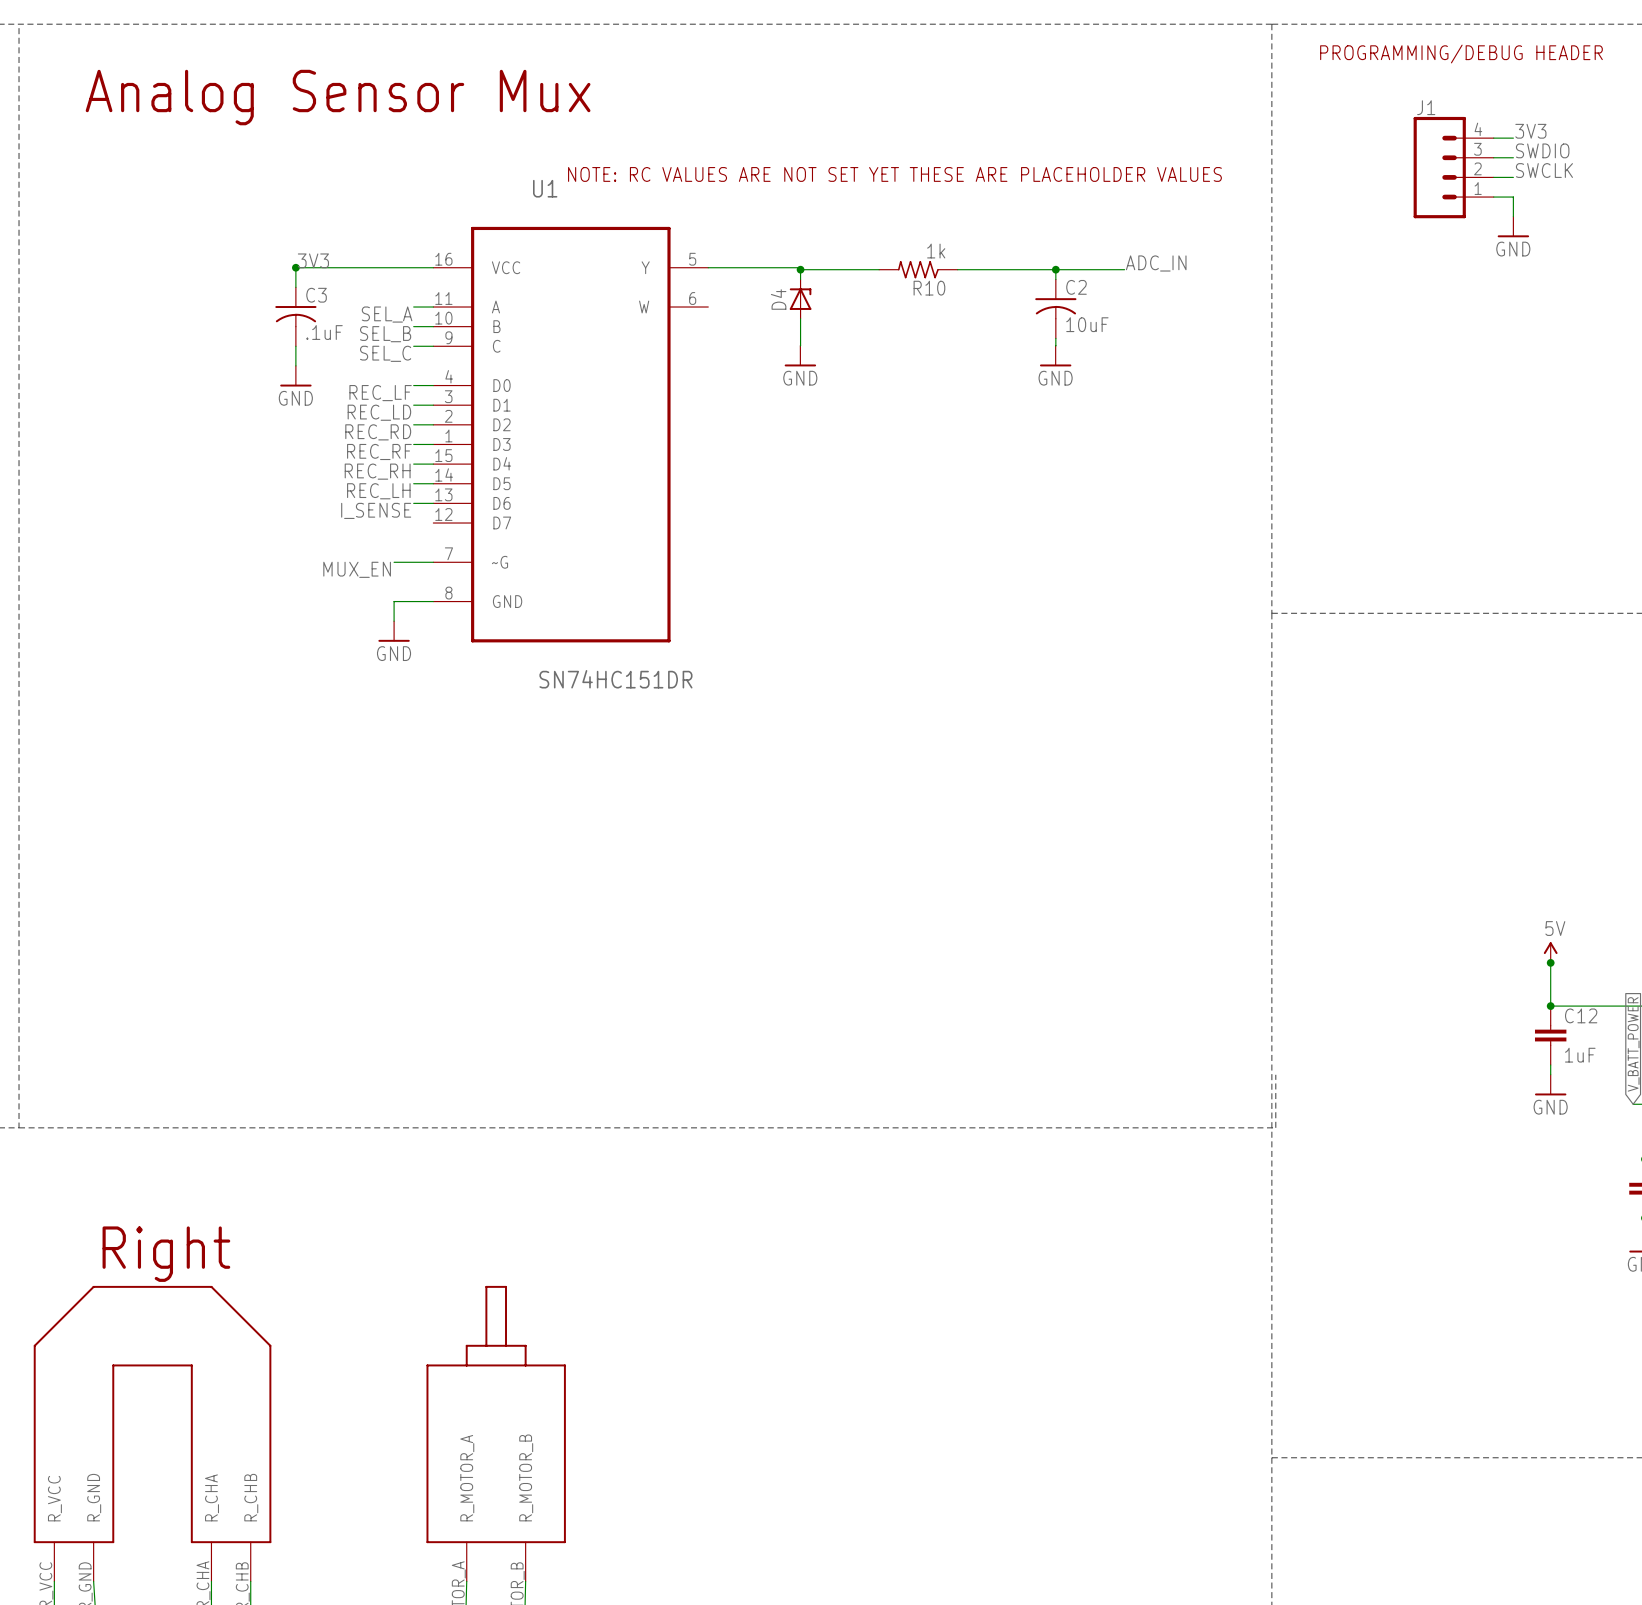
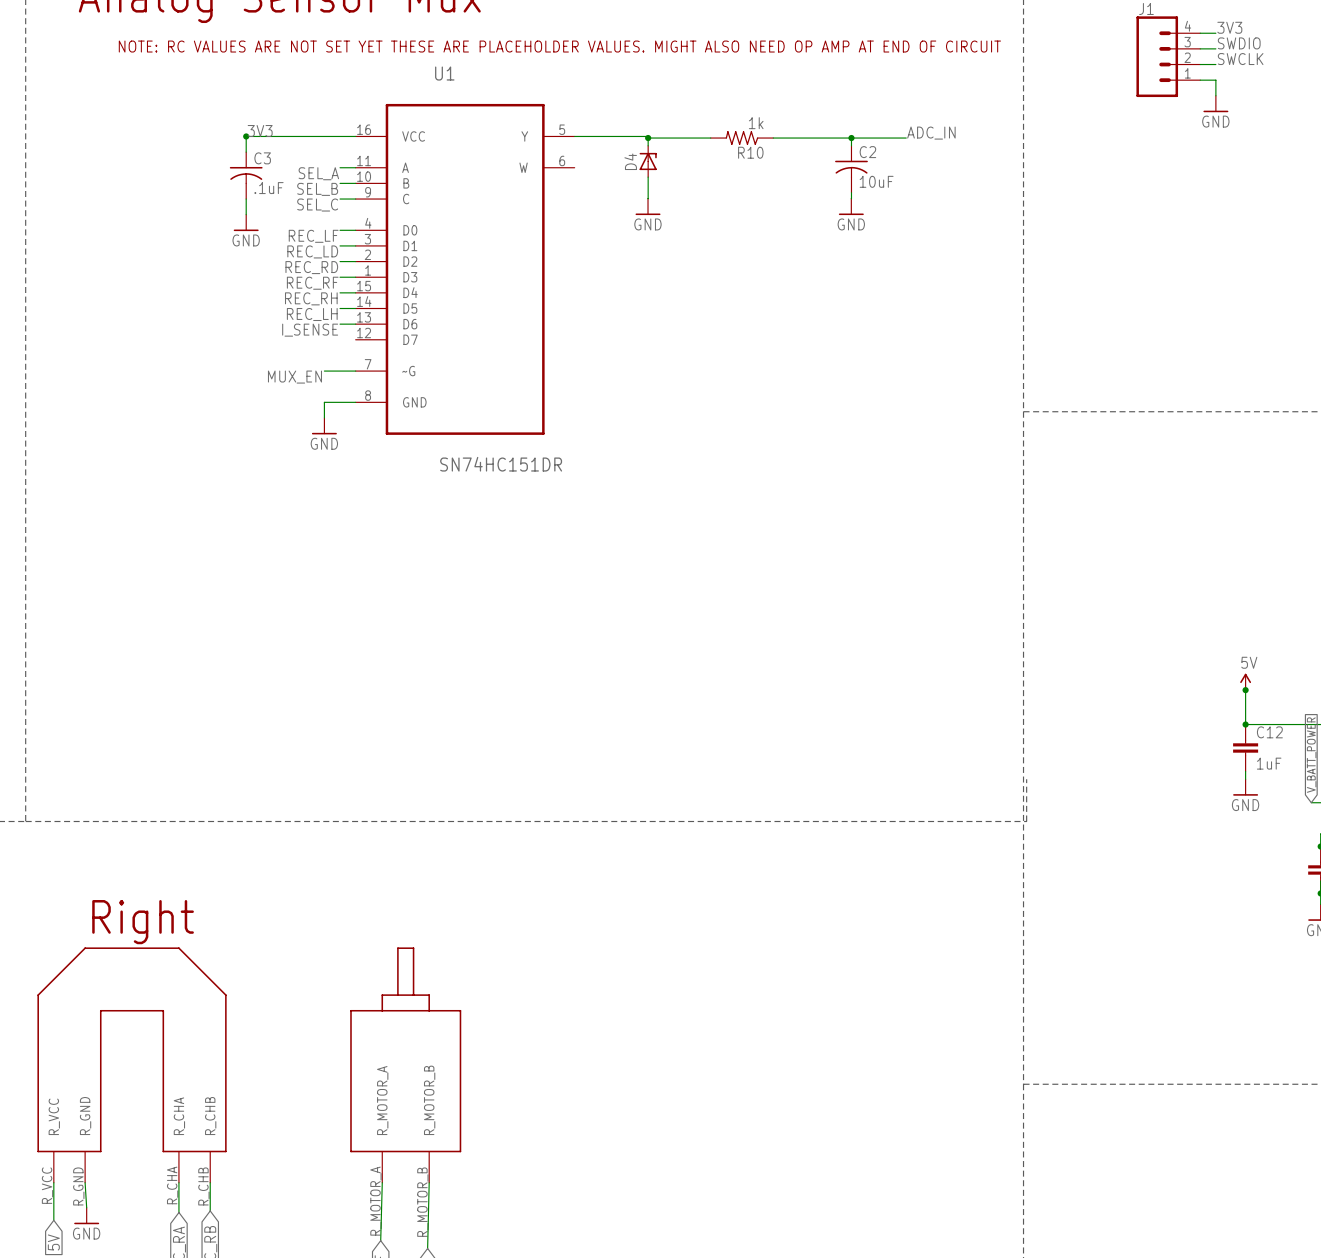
text: none -> NOTE: RC VALUES ARE NOT SET YET THESE ARE PLACEHOLDER VALUES. MIGHT ALSO NEED OP AMP AT END OF CIRCUIT (559, 46)
text: NOTE: RC VALUES ARE NOT SET YET THESE ARE PLACEHOLDER VALUES (894, 174) -> none

